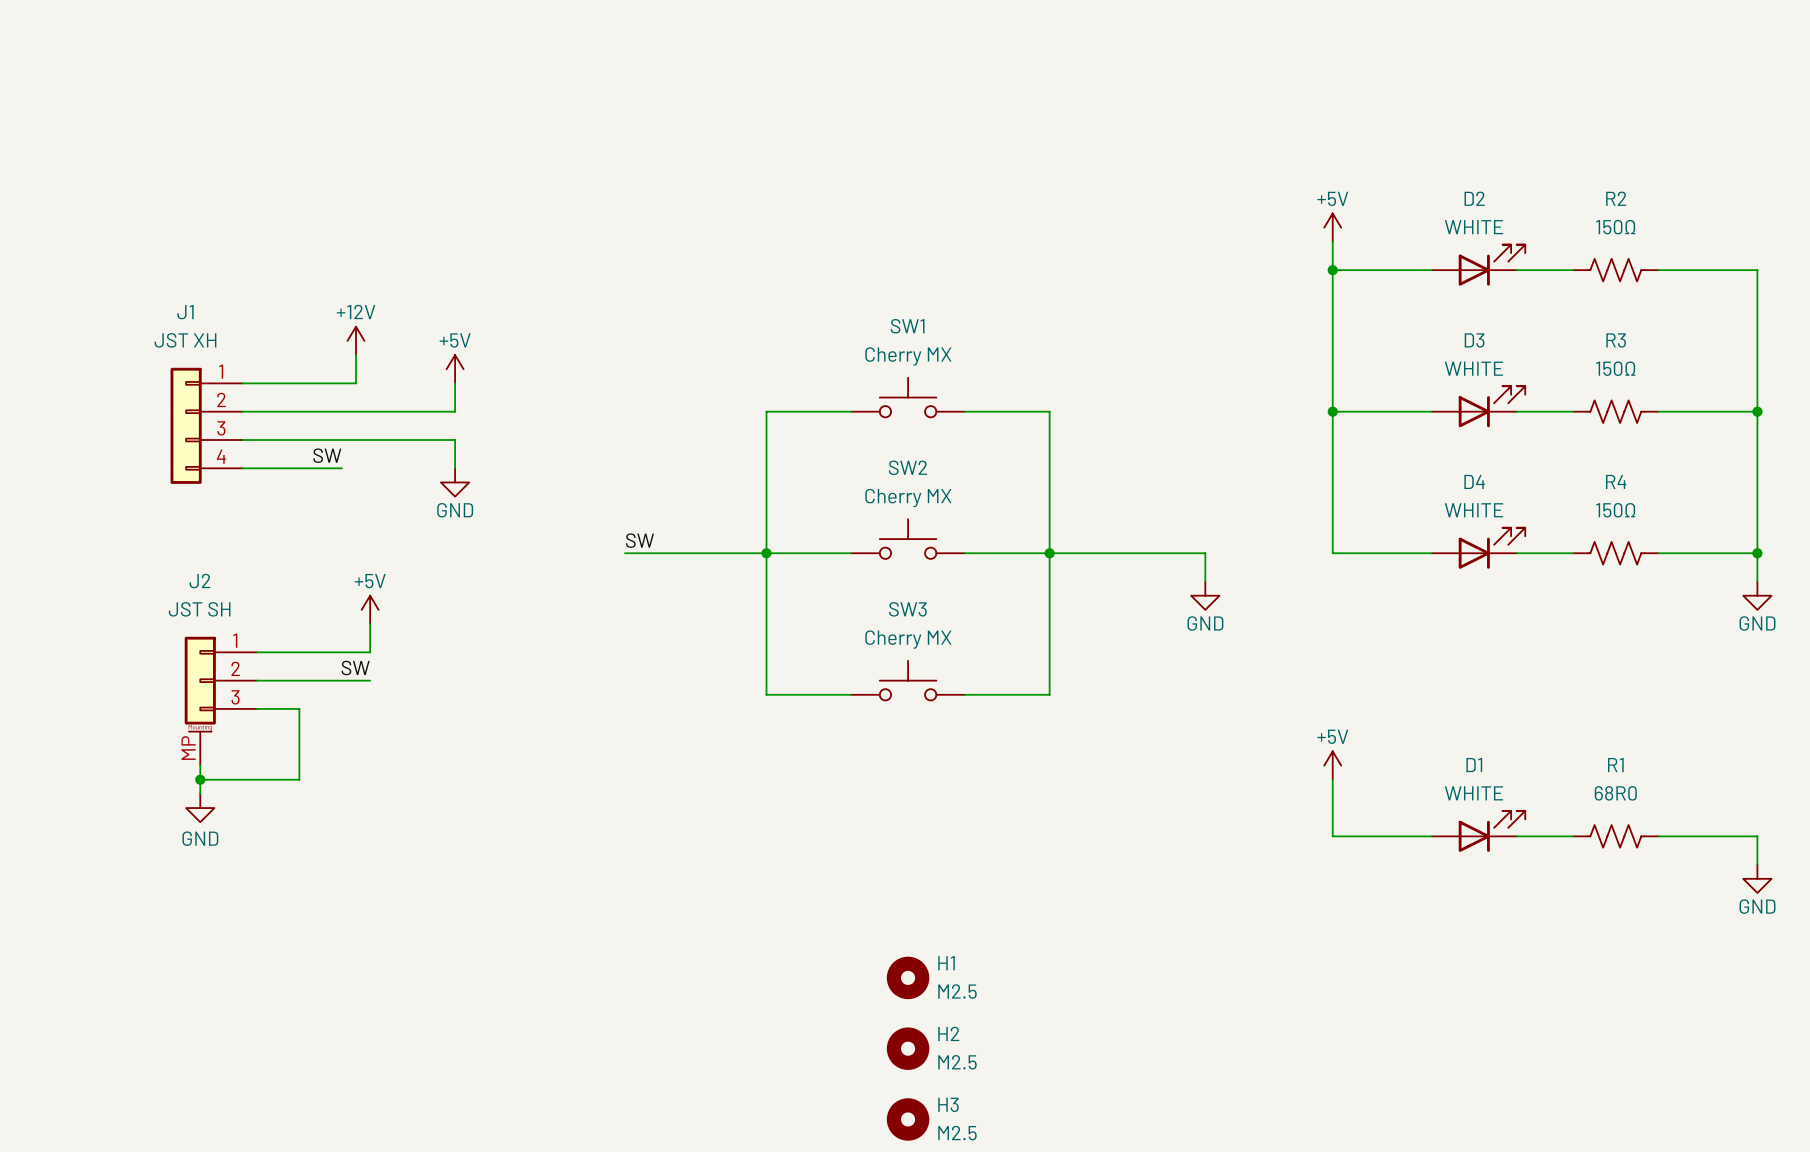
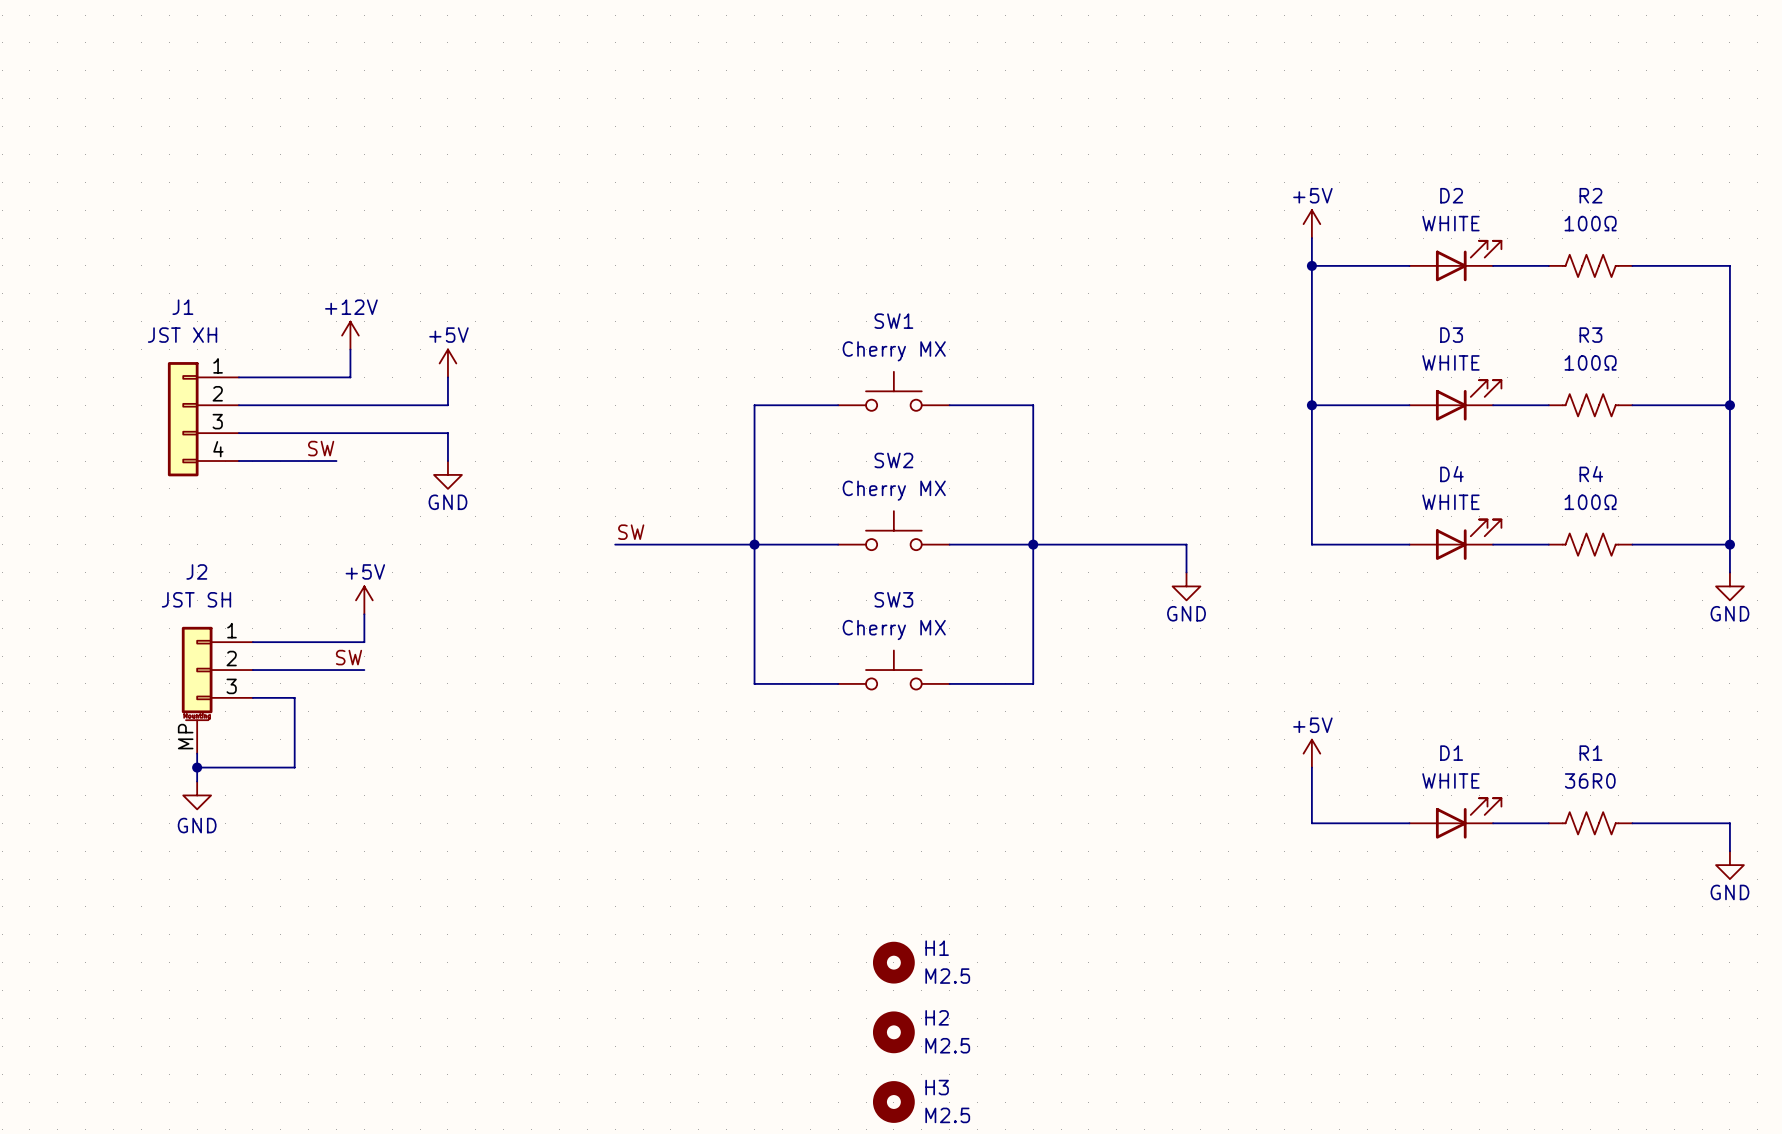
R2 value: 150Ω (1615, 227) -> 100Ω (1590, 223)
R3 value: 150Ω (1615, 368) -> 100Ω (1590, 362)
R4 value: 150Ω (1615, 510) -> 100Ω (1590, 502)
R1 value: 68R0 (1615, 793) -> 36R0 (1590, 780)

